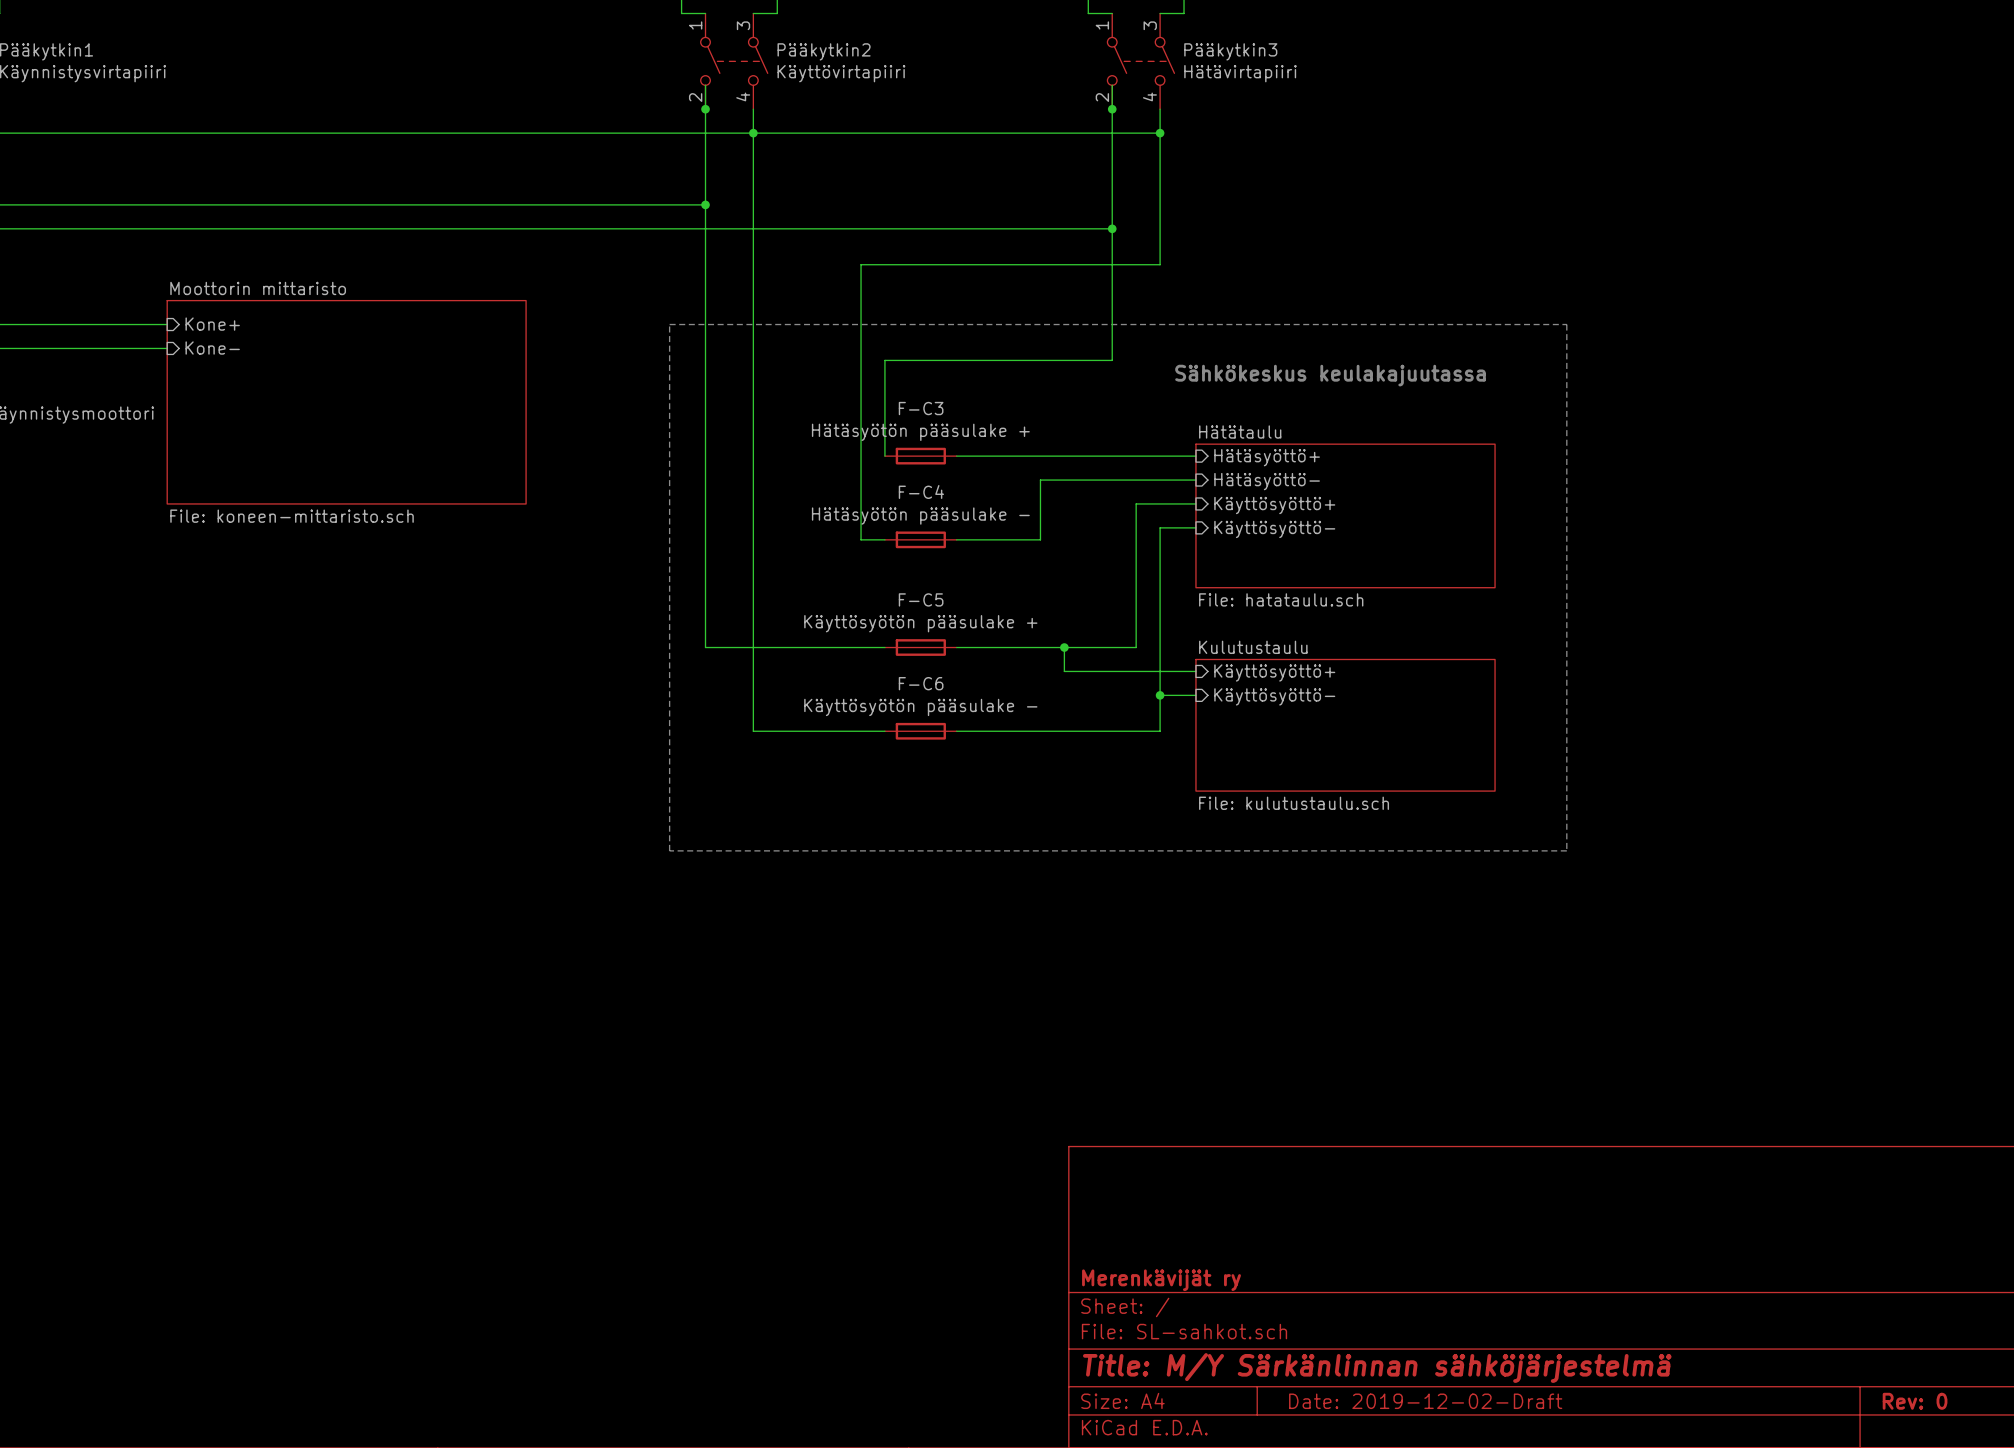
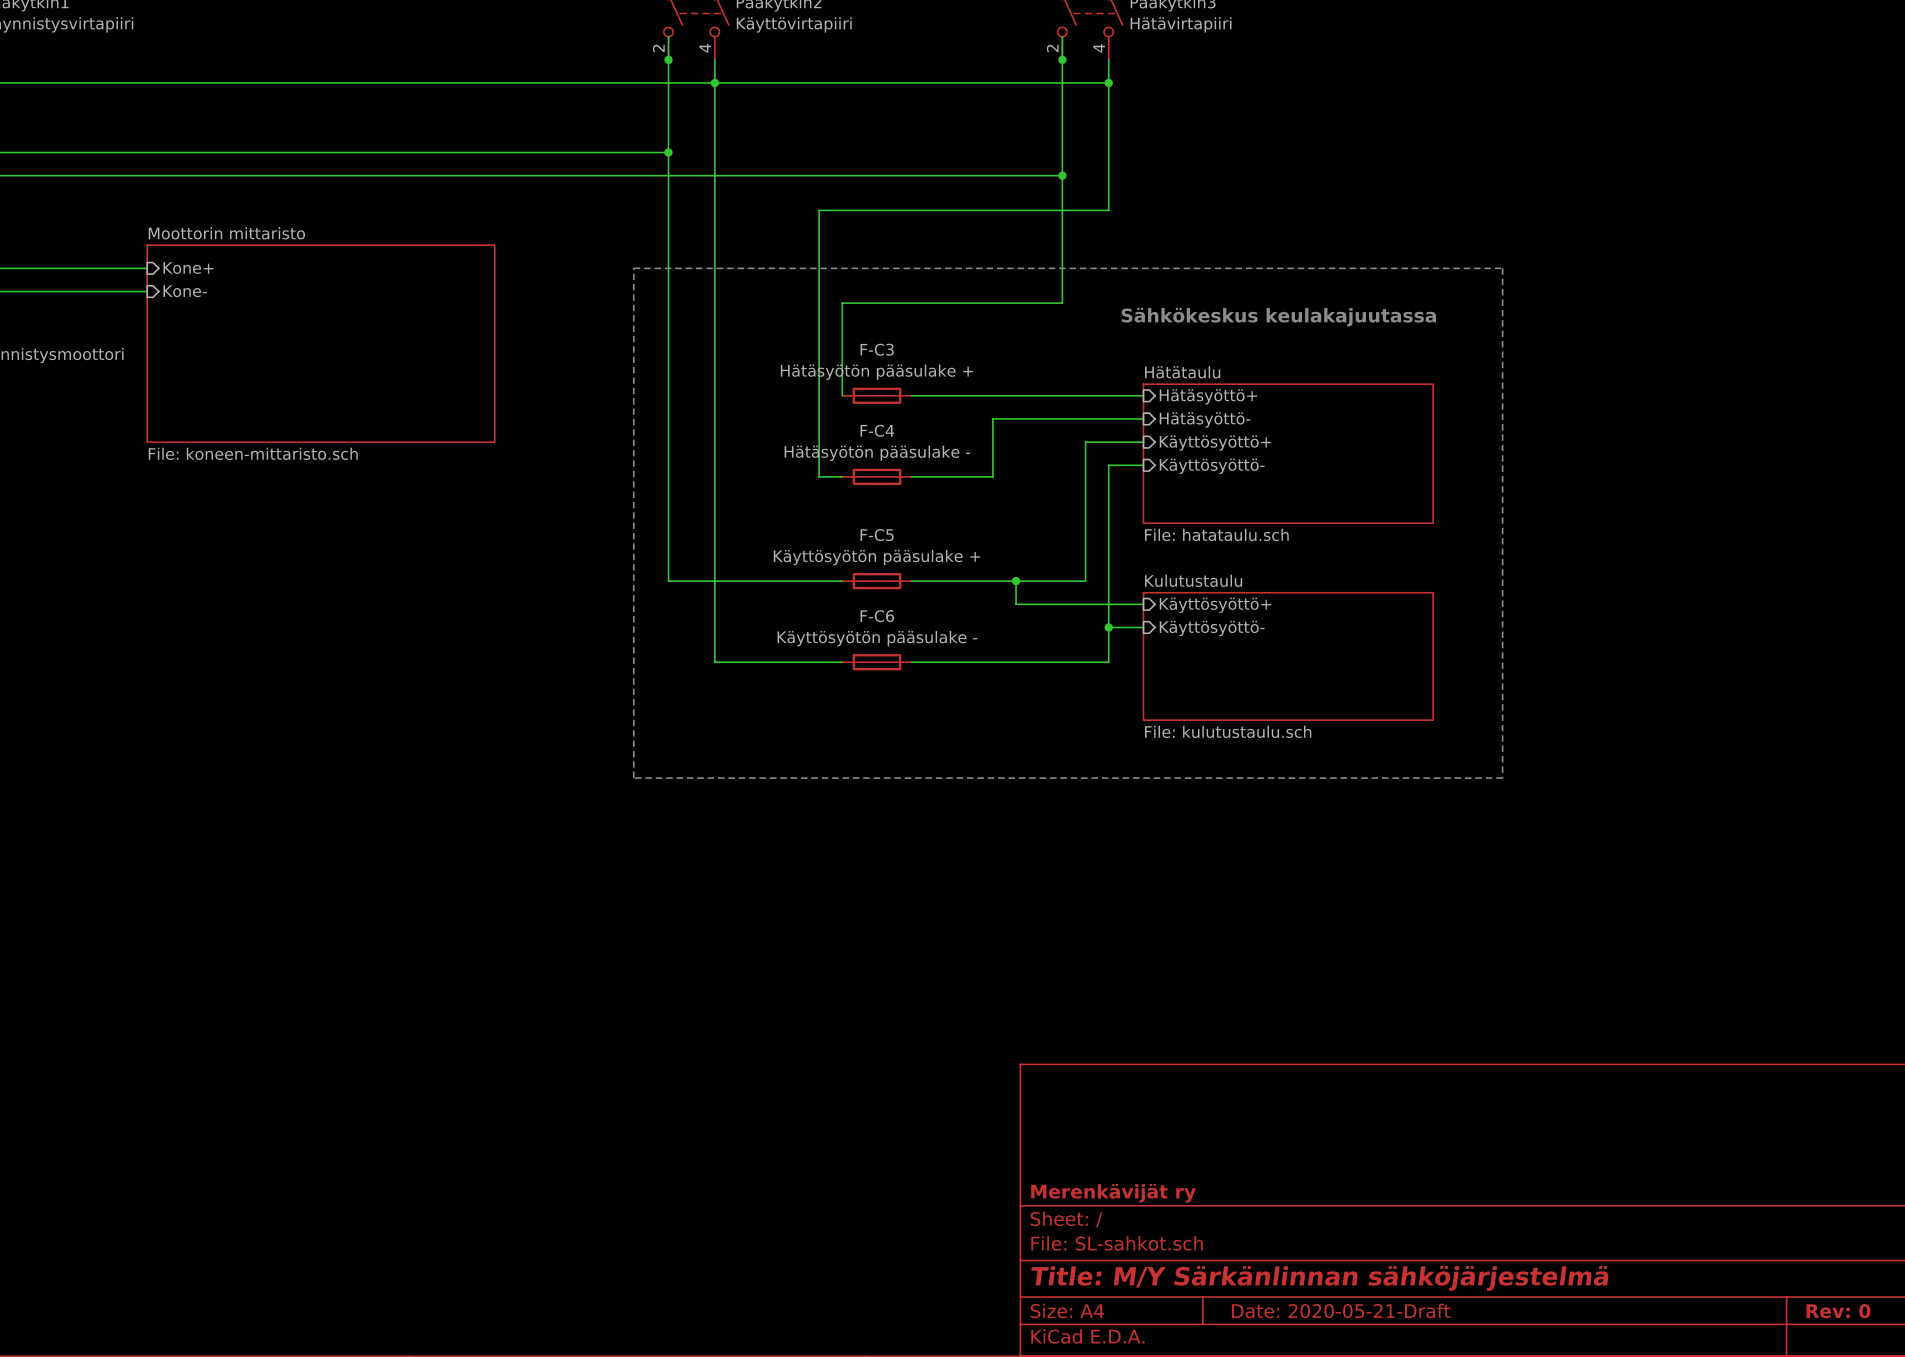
title block: Date: 2019-12-02-Draft (1425, 1401) -> Date: 2020-05-21-Draft (1341, 1310)

